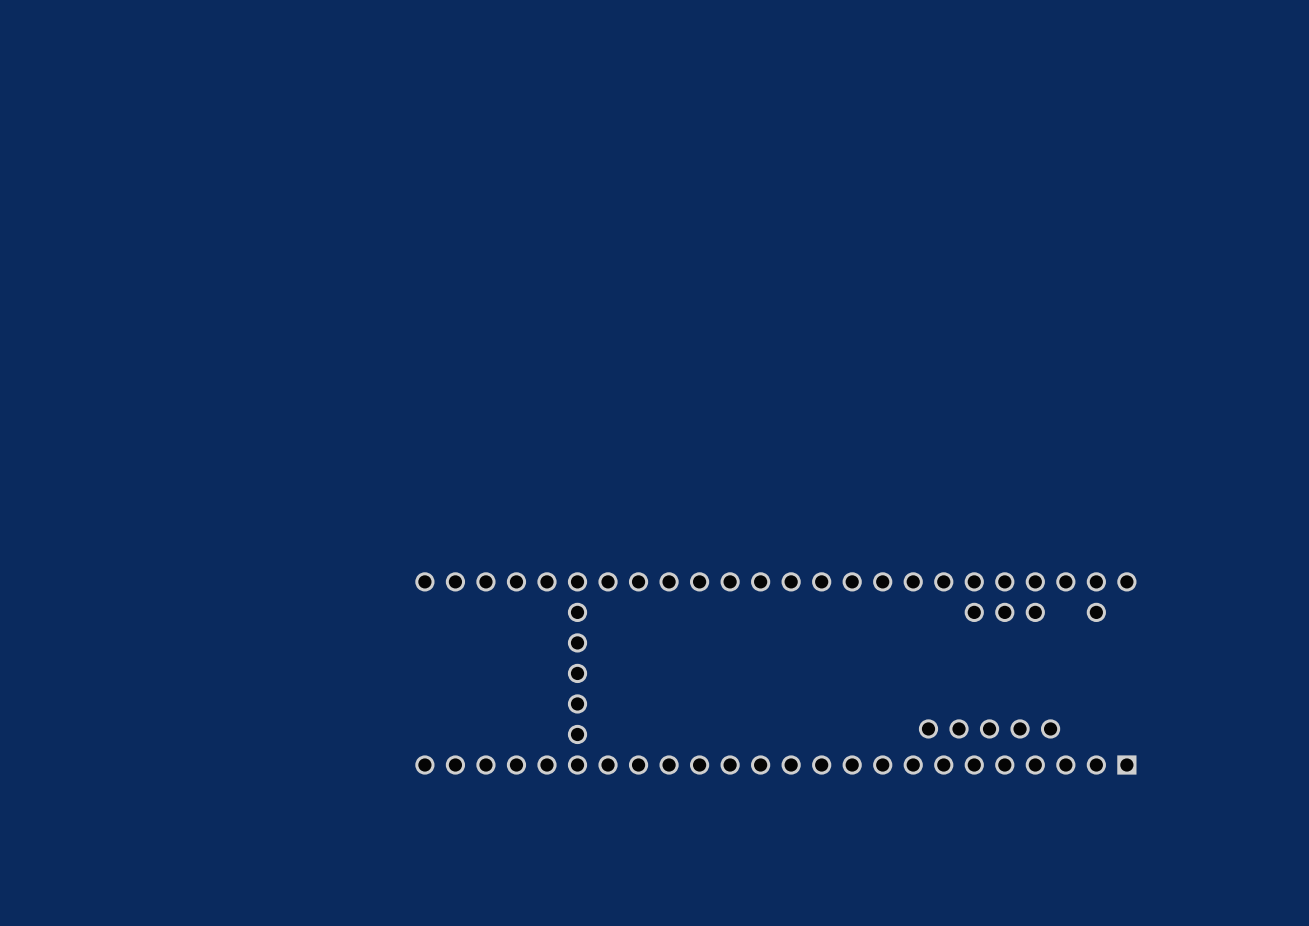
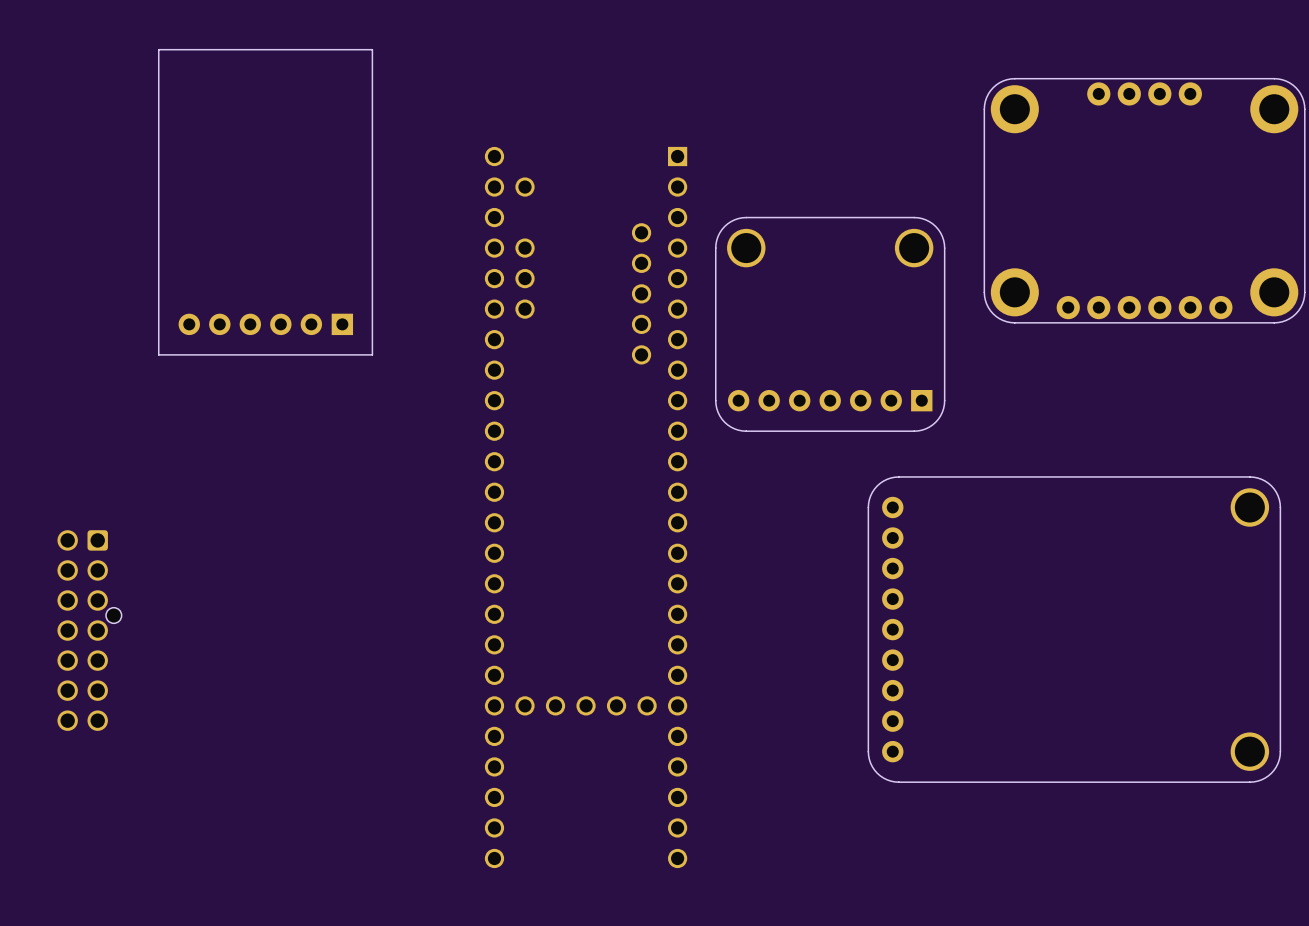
part: none -> (1144, 200)
part: none -> (265, 202)
part: none -> (830, 324)
part: none -> (1074, 629)
part: none -> (89, 630)
part rotation: 0° (775, 673) -> 90° counterclockwise (586, 507)

